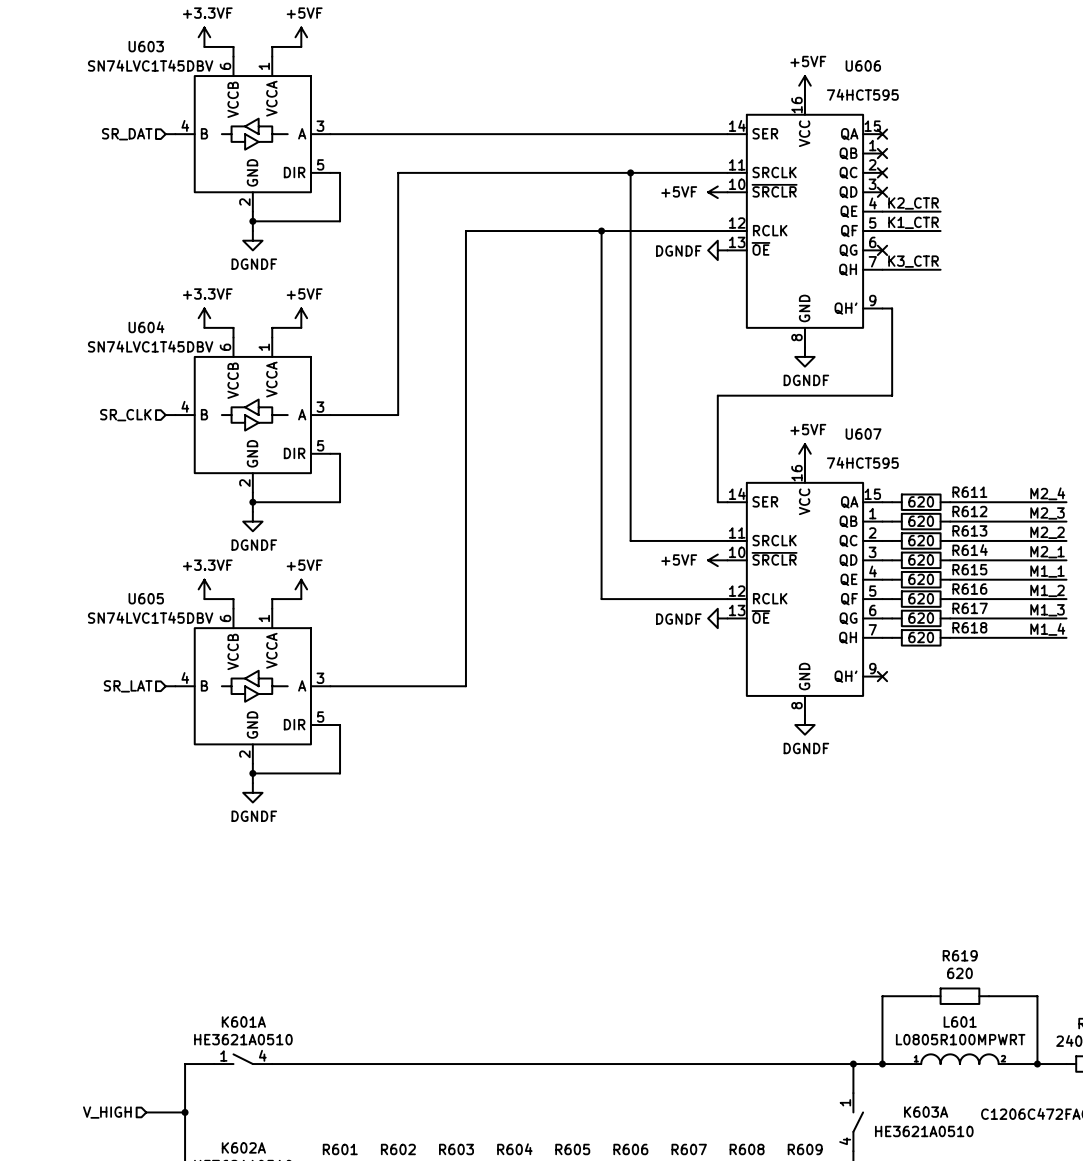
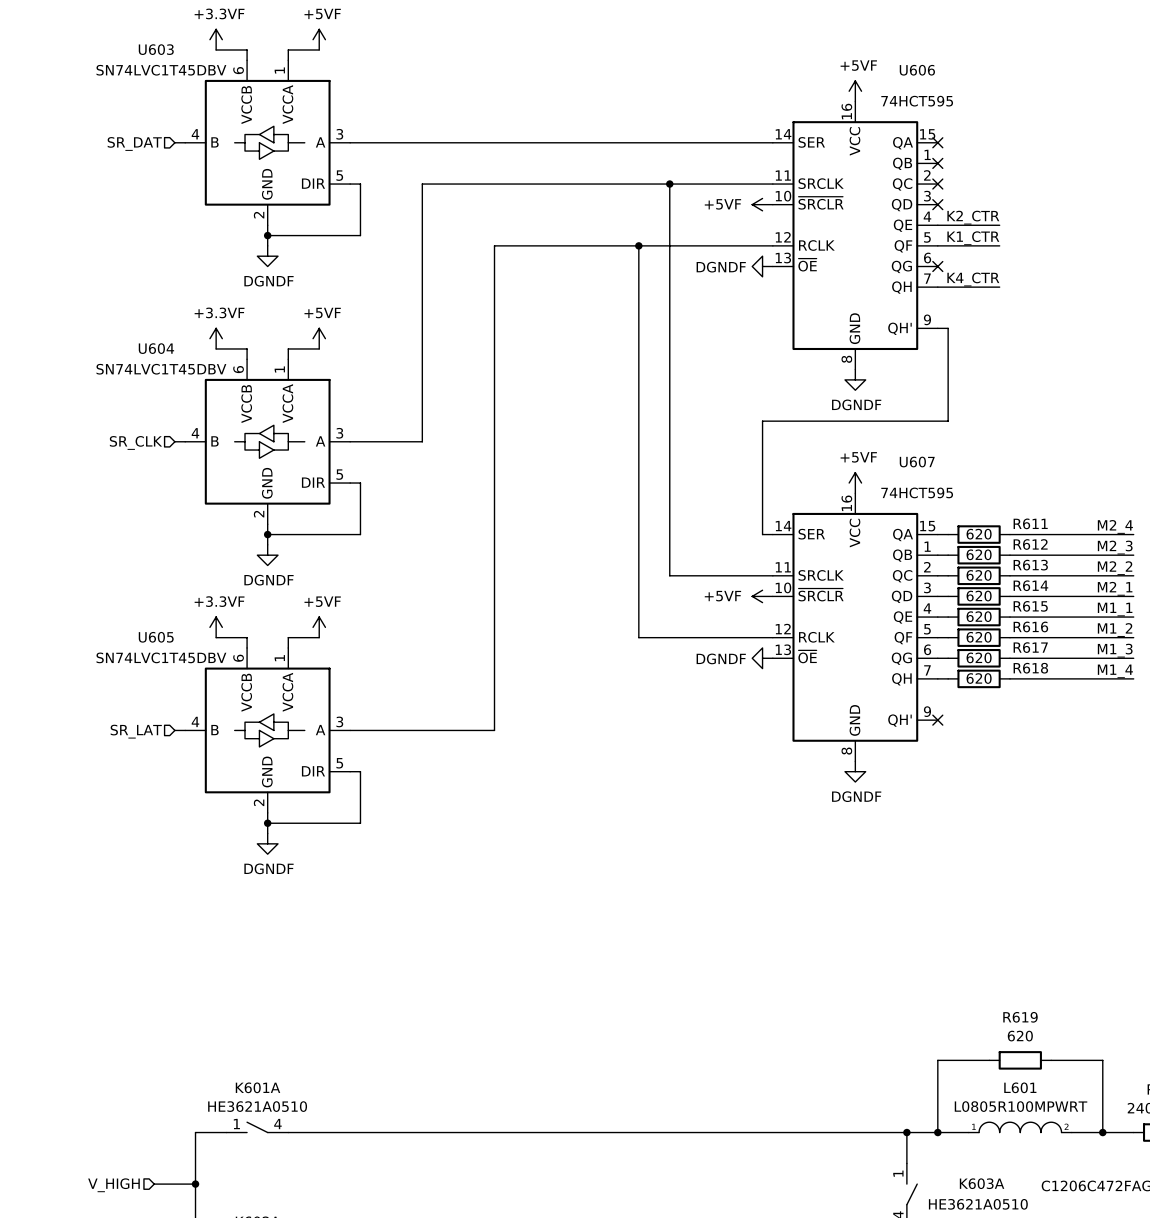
label: K3_CTR (913, 261) -> K4_CTR (973, 279)

